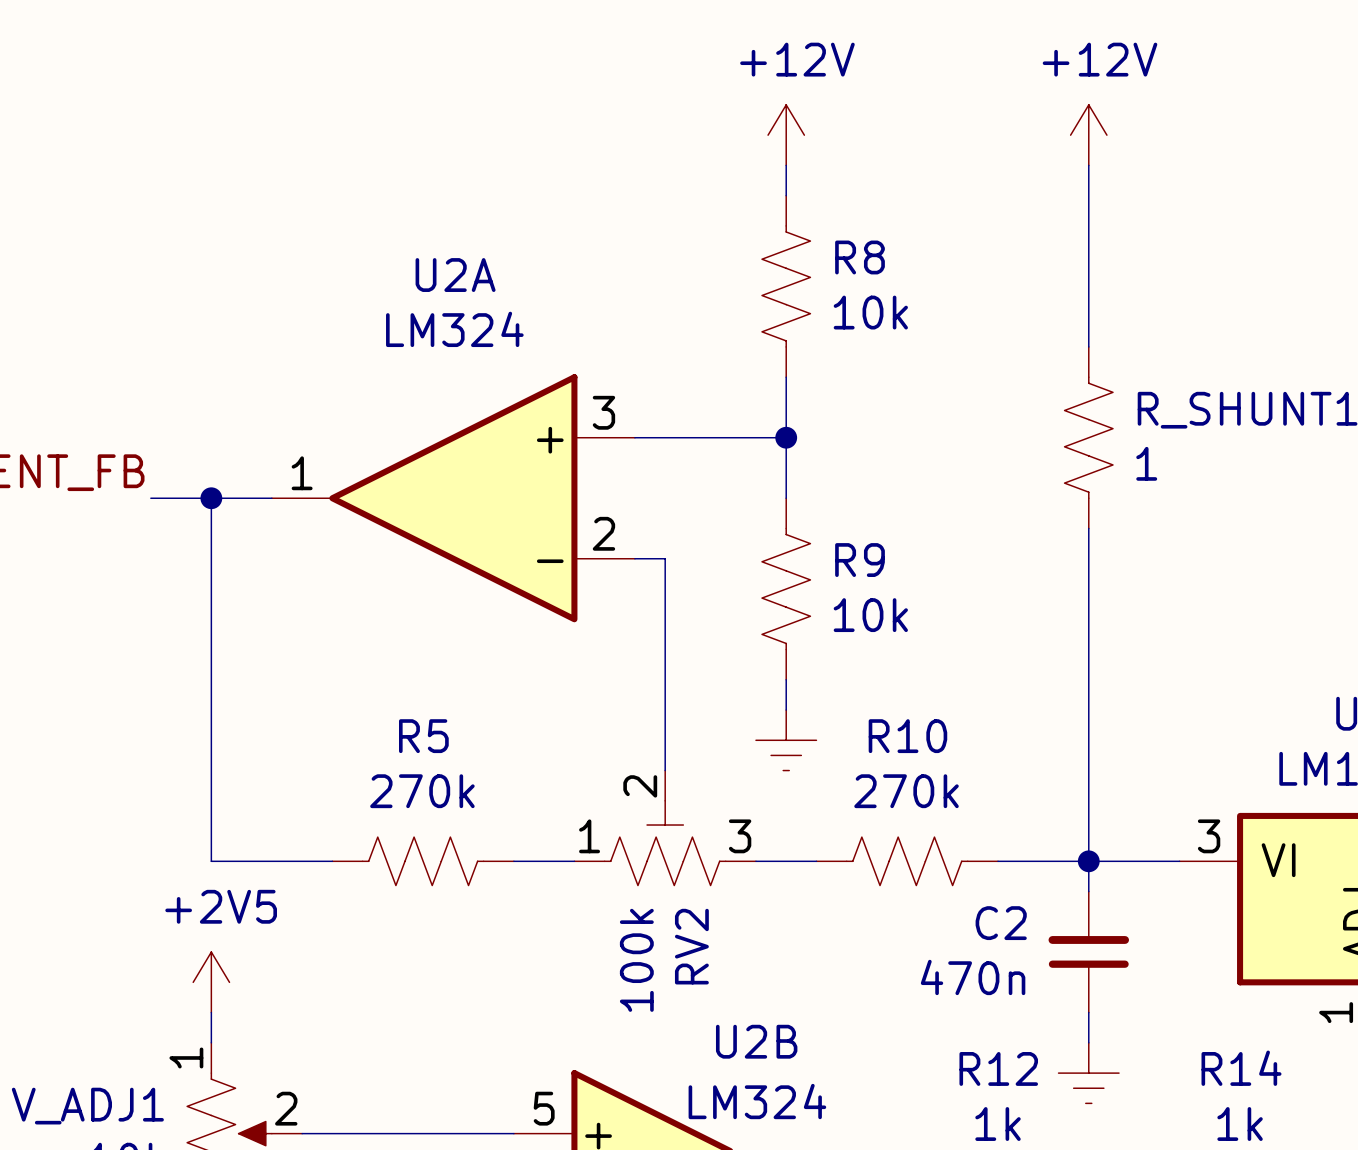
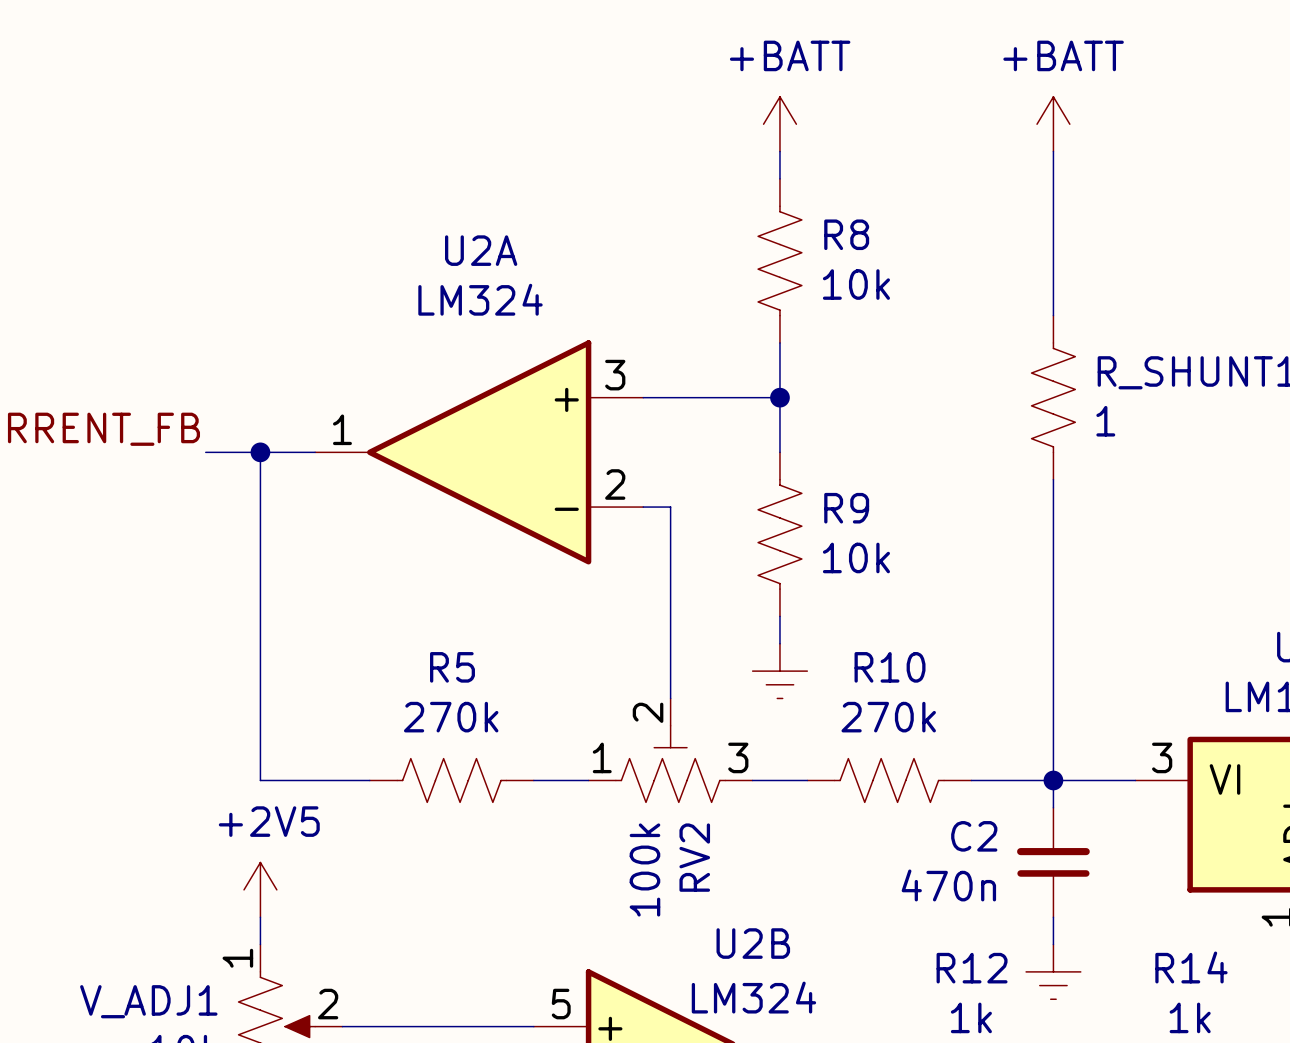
power symbol: +12V (786, 135) -> +BATT (779, 124)
power symbol: +12V (1088, 135) -> +BATT (1053, 124)

